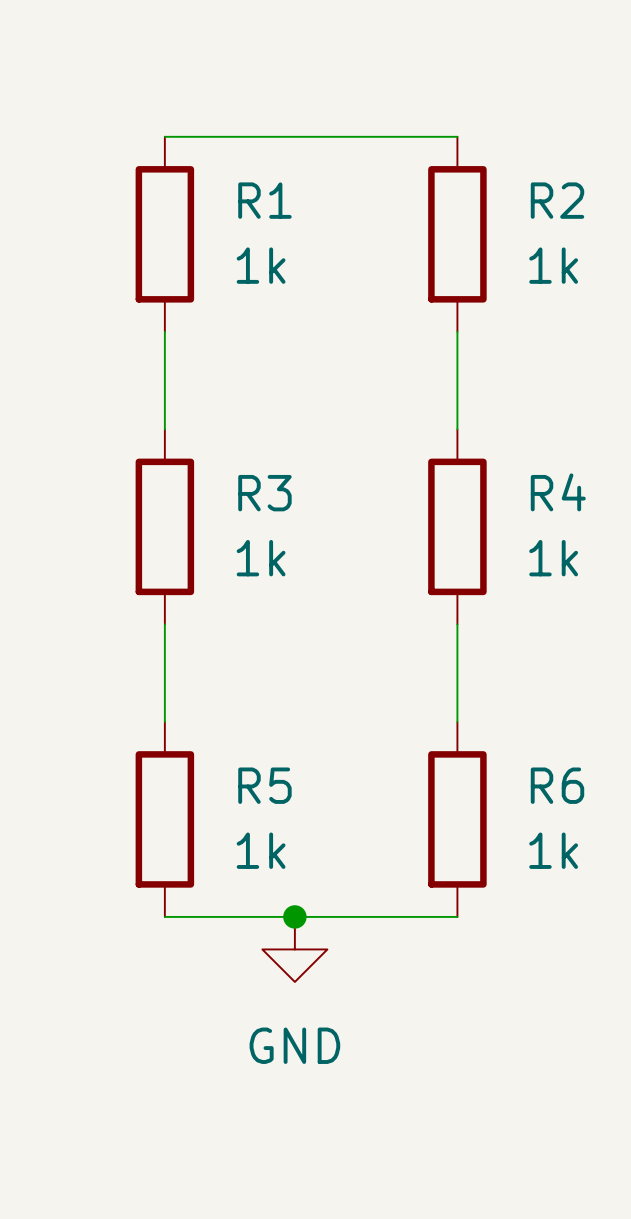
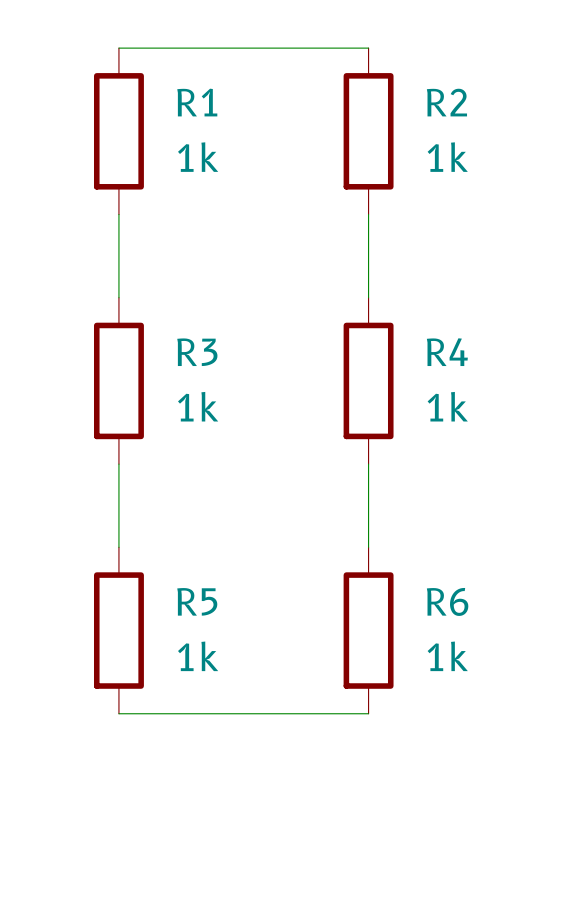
junction: (294, 916) -> none
power symbol: GND (294, 949) -> none

